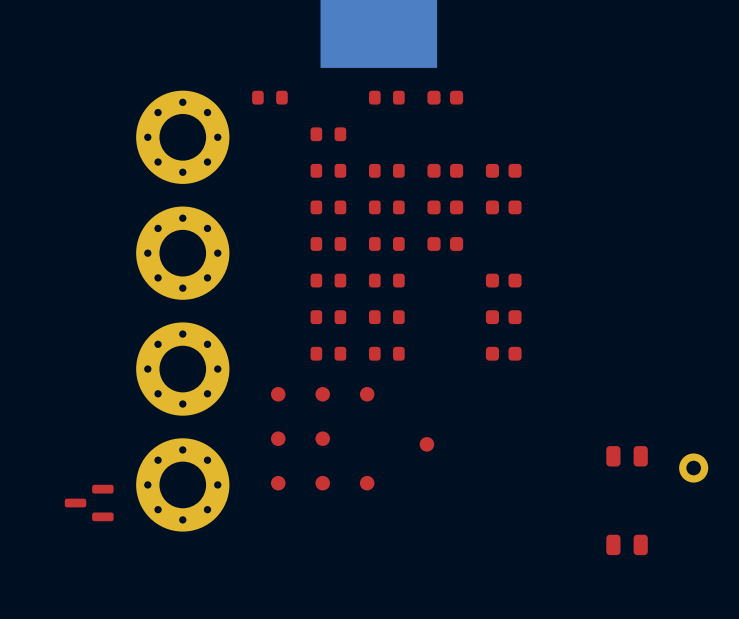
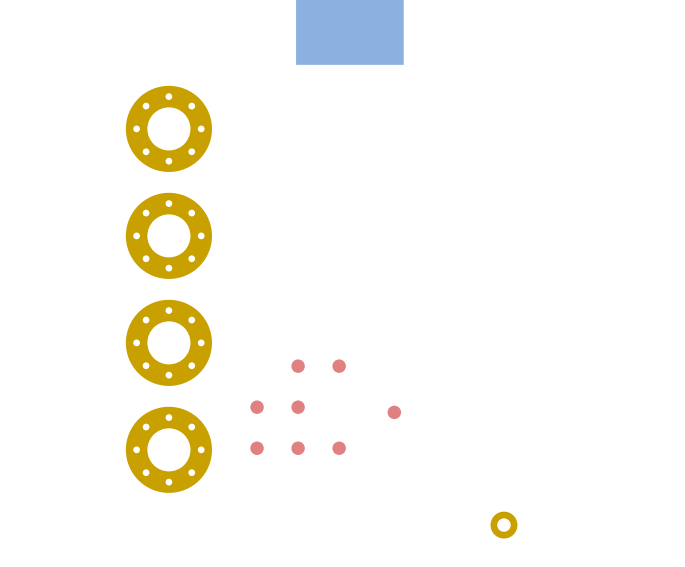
part: (269, 97) -> none
part: (386, 97) -> none
part: (445, 97) -> none
part: (328, 134) -> none
part: (328, 170) -> none
part: (386, 170) -> none
part: (445, 170) -> none
part: (503, 170) -> none
part: (328, 207) -> none
part: (386, 207) -> none
part: (445, 207) -> none
part: (503, 207) -> none
part: (328, 243) -> none
part: (386, 243) -> none
part: (445, 243) -> none
part: (328, 280) -> none
part: (386, 280) -> none
part: (503, 280) -> none
part: (328, 317) -> none
part: (386, 317) -> none
part: (503, 317) -> none
part: (328, 353) -> none
part: (386, 353) -> none
part: (503, 353) -> none
part: (278, 394) -> none
part: (627, 456) -> none
part position: (693, 468) -> (503, 525)
part: (89, 503) -> none
part: (627, 544) -> none

